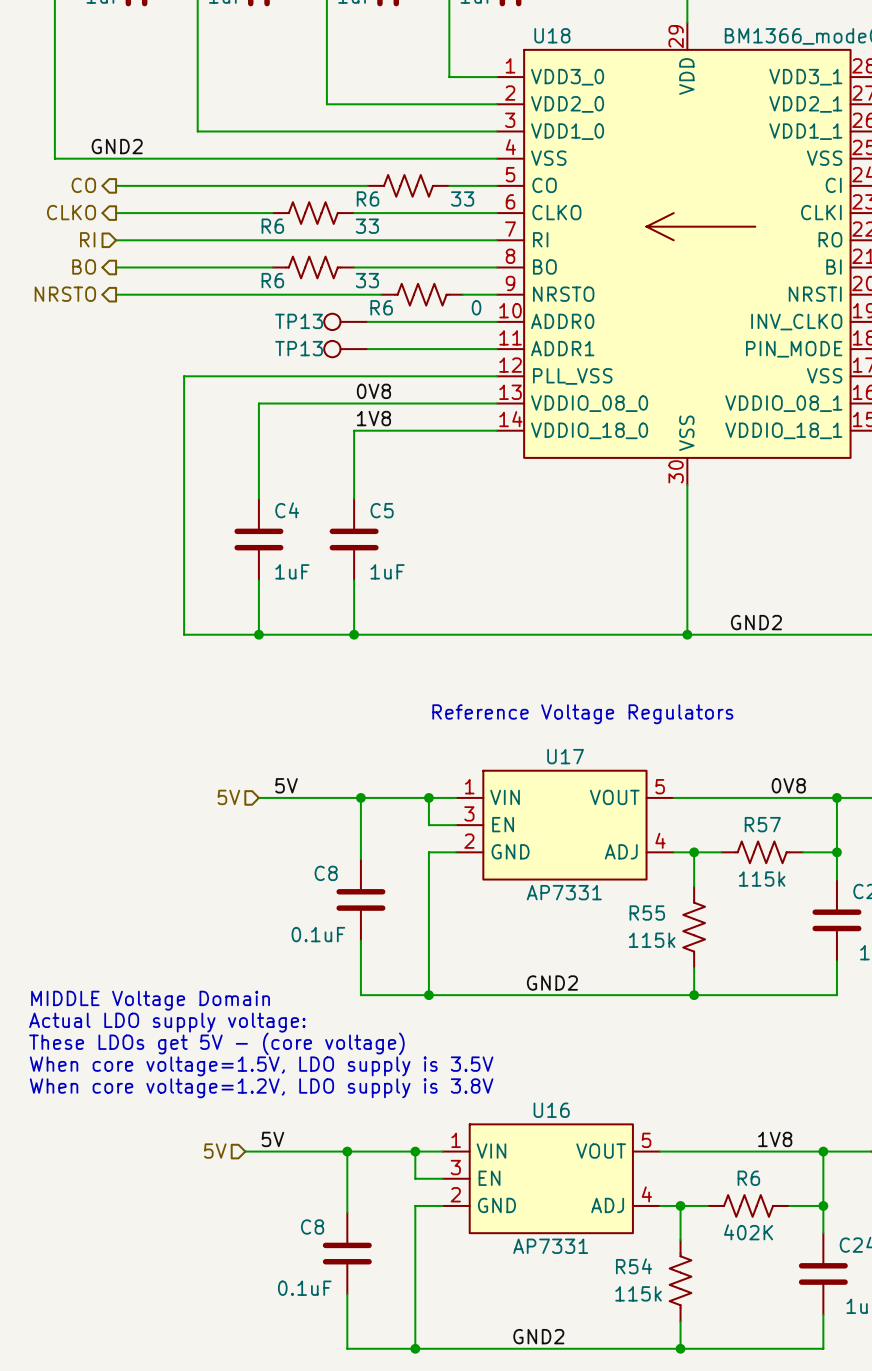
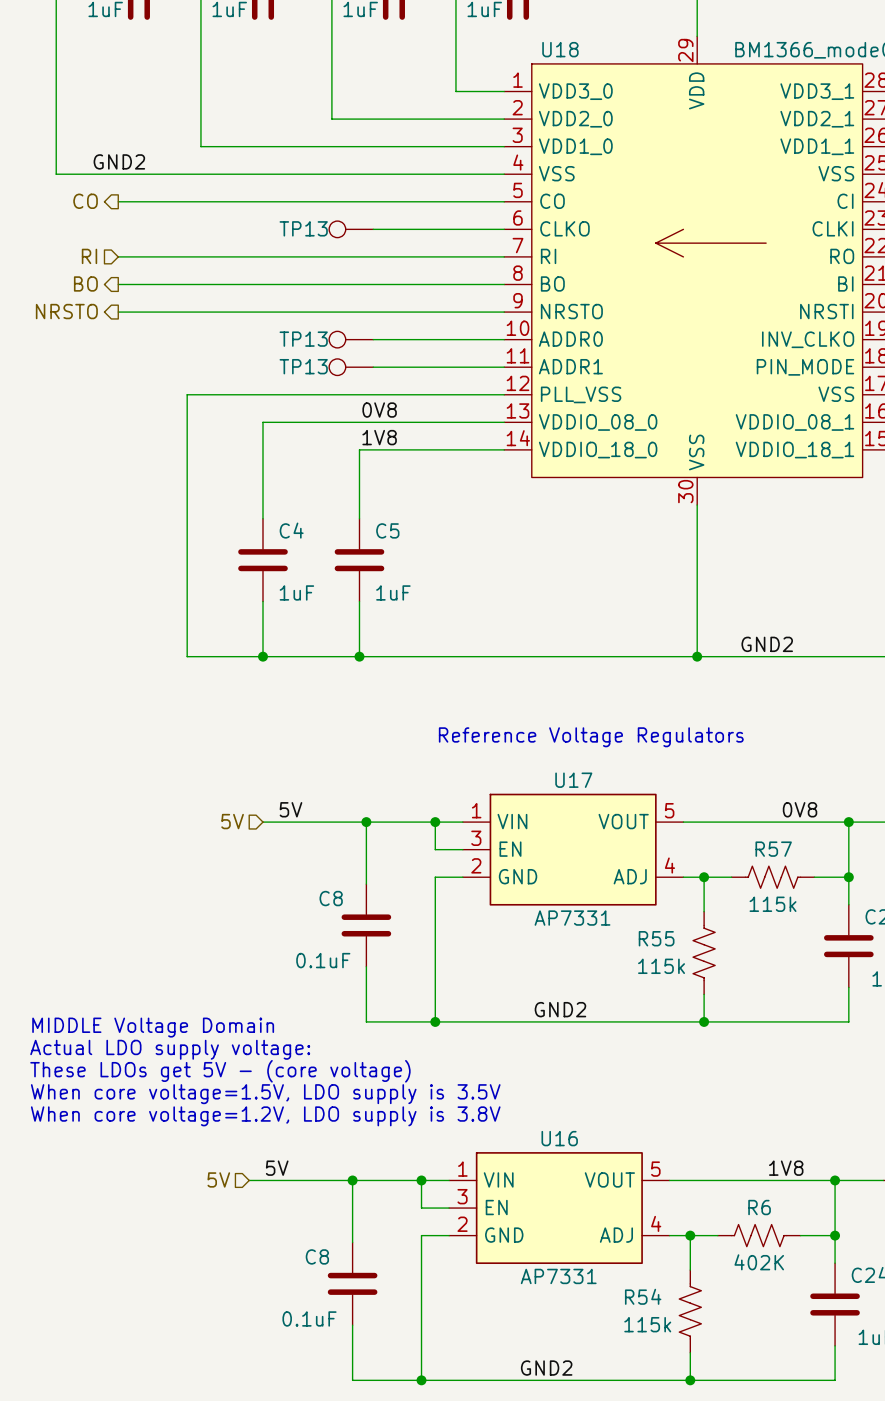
R6: 33 (408, 185) -> none
hierarchical label: CLKO (71, 212) -> none
wire: (116, 213) (272, 213) -> none
R6: 33 (313, 213) -> none
TP13: none -> (351, 229)
R6: 33 (313, 267) -> none
R6: 0 (422, 294) -> none

